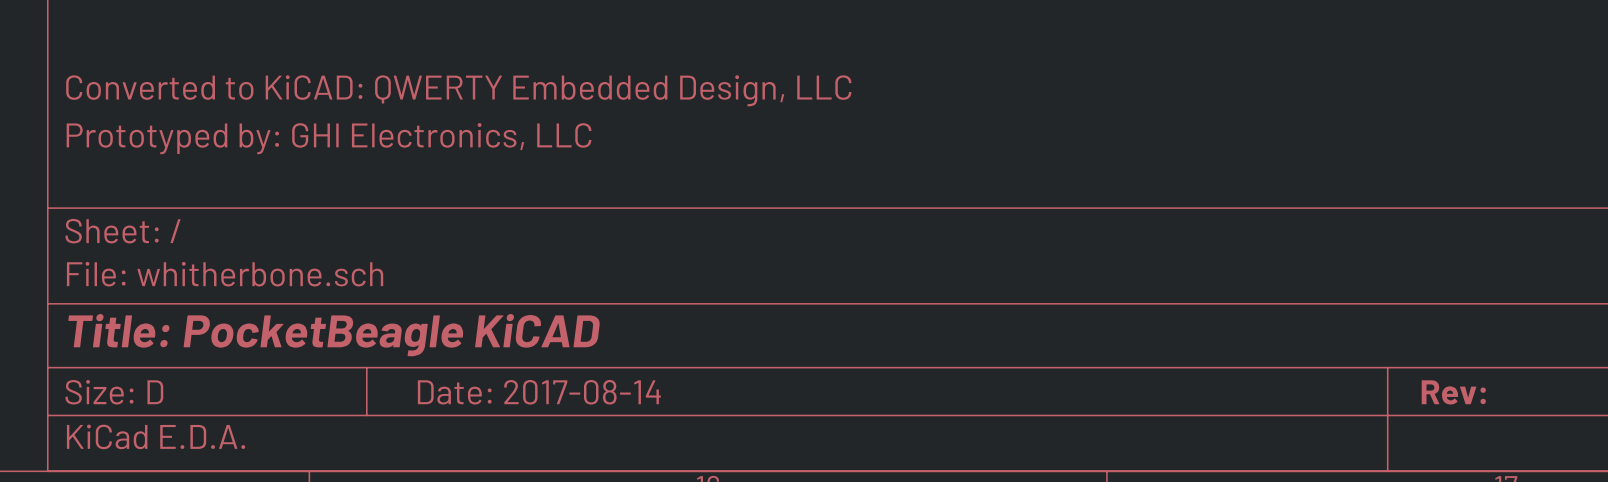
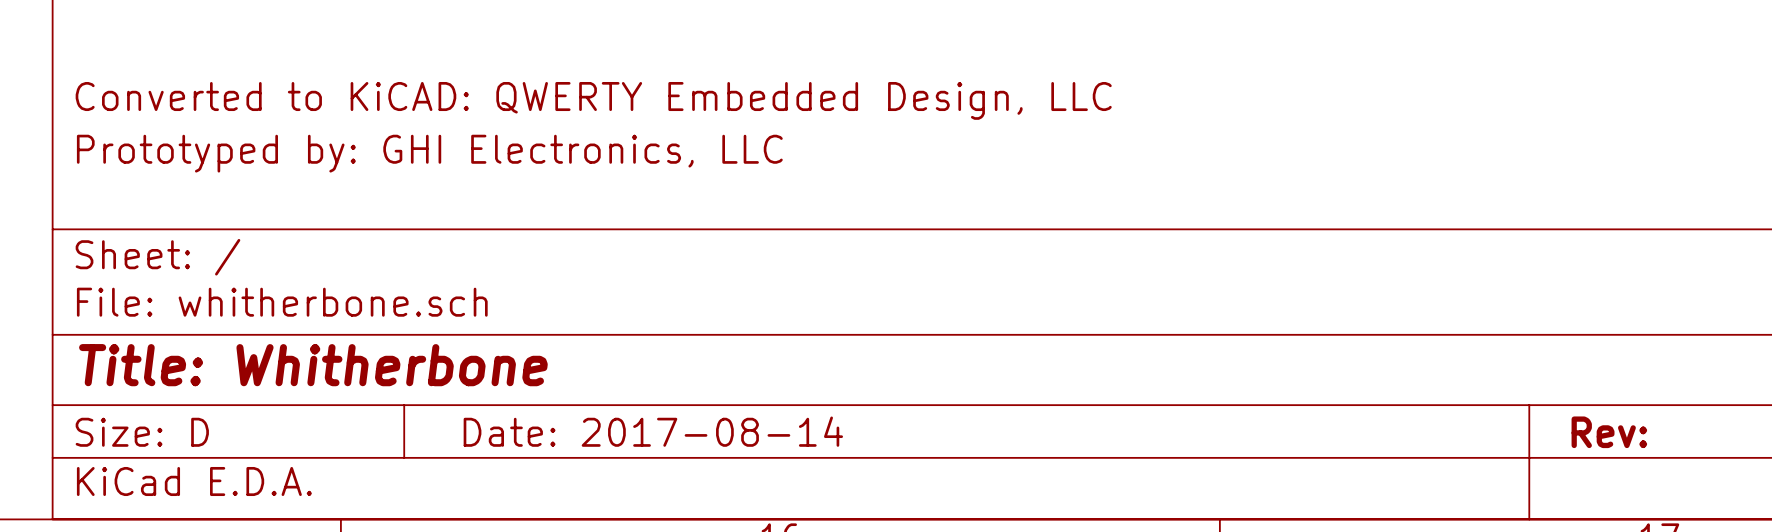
title block: Title: PocketBeagle KiCAD (334, 335) -> Title: Whitherbone (313, 365)

